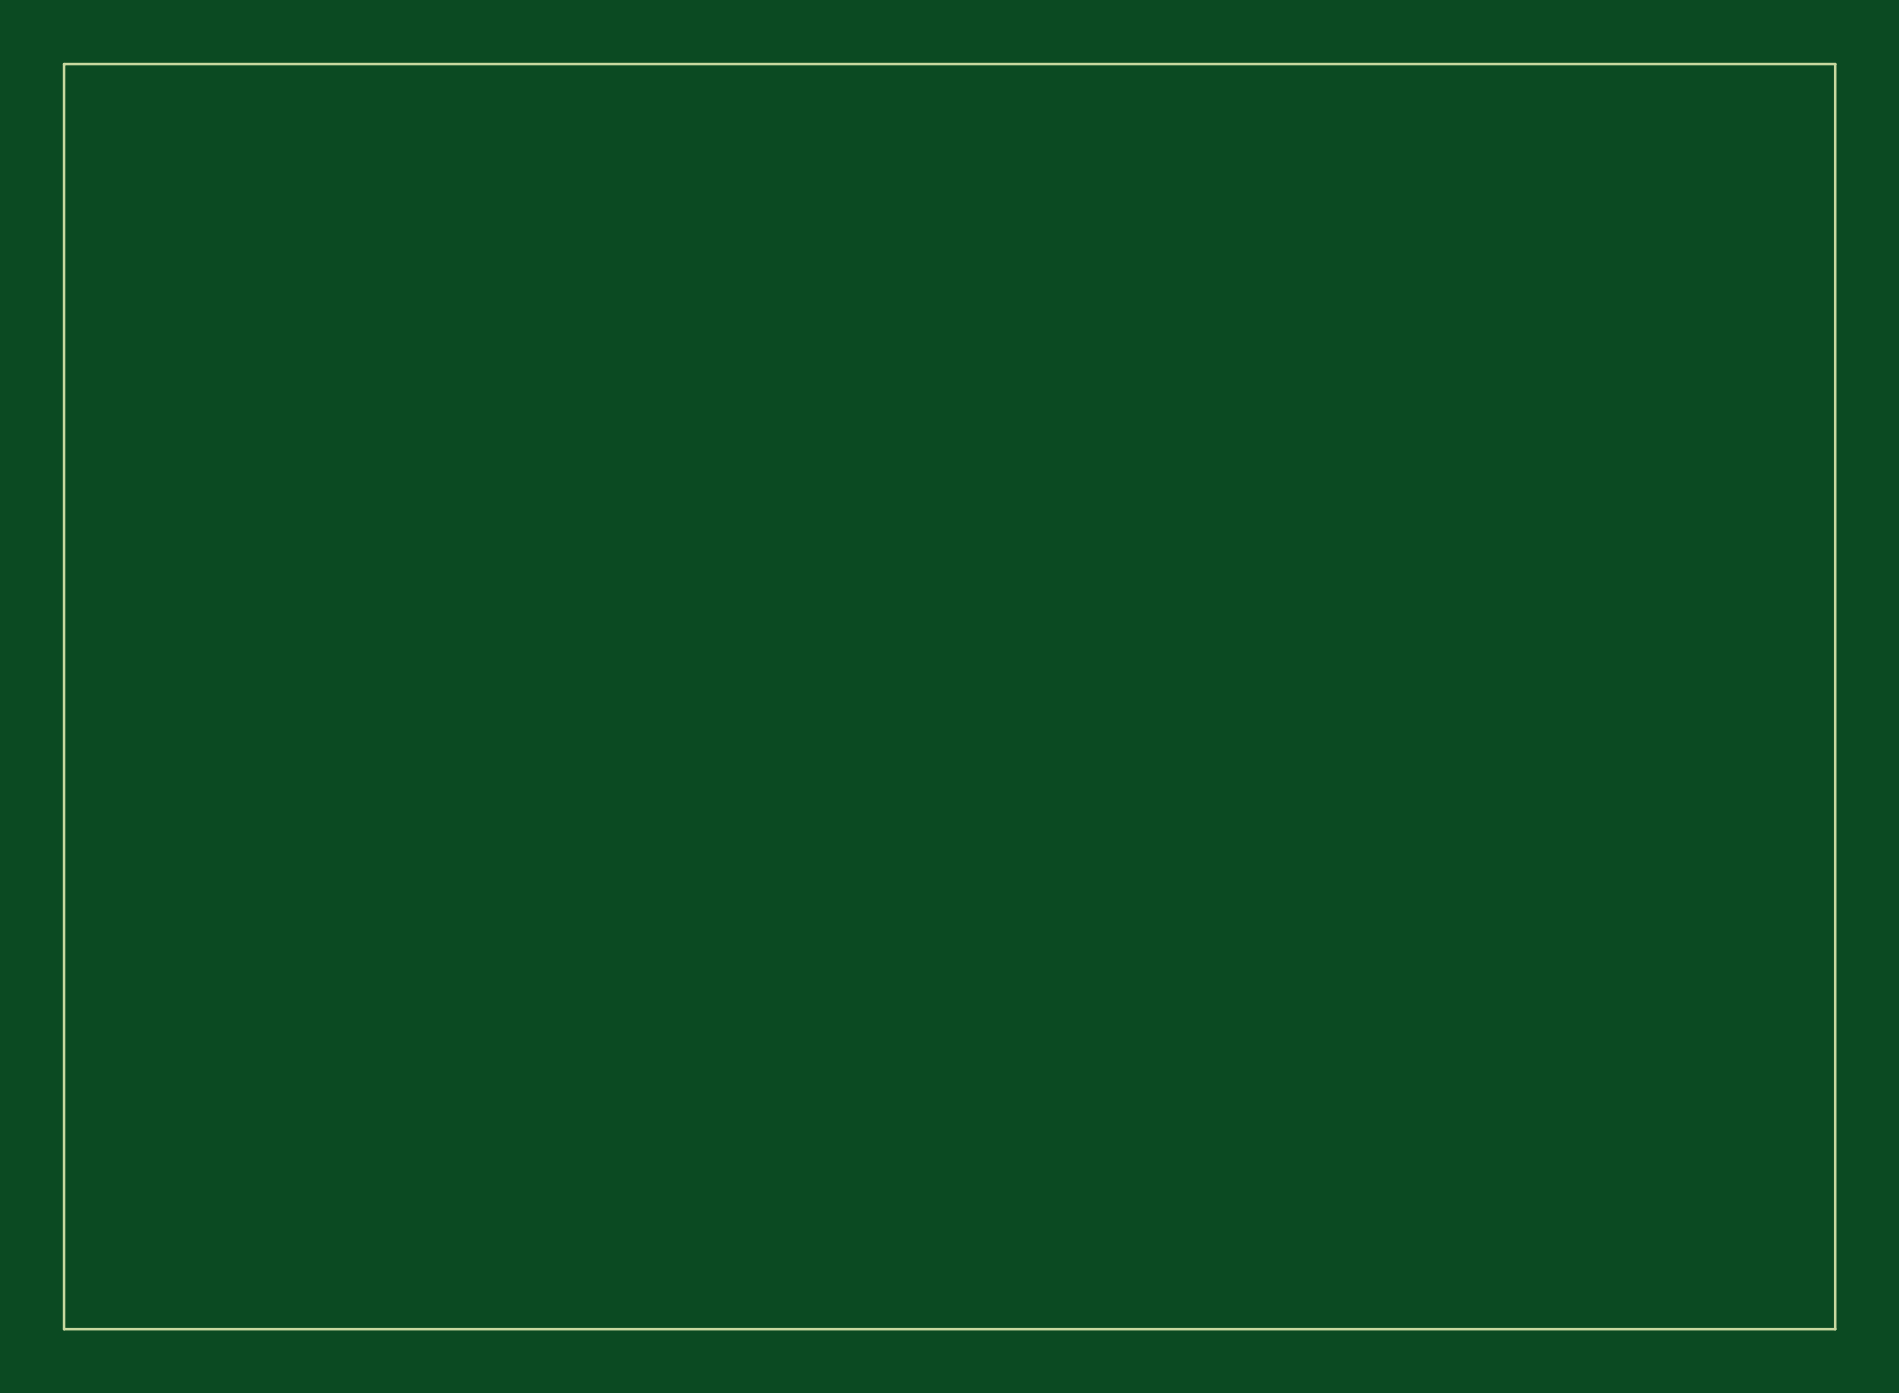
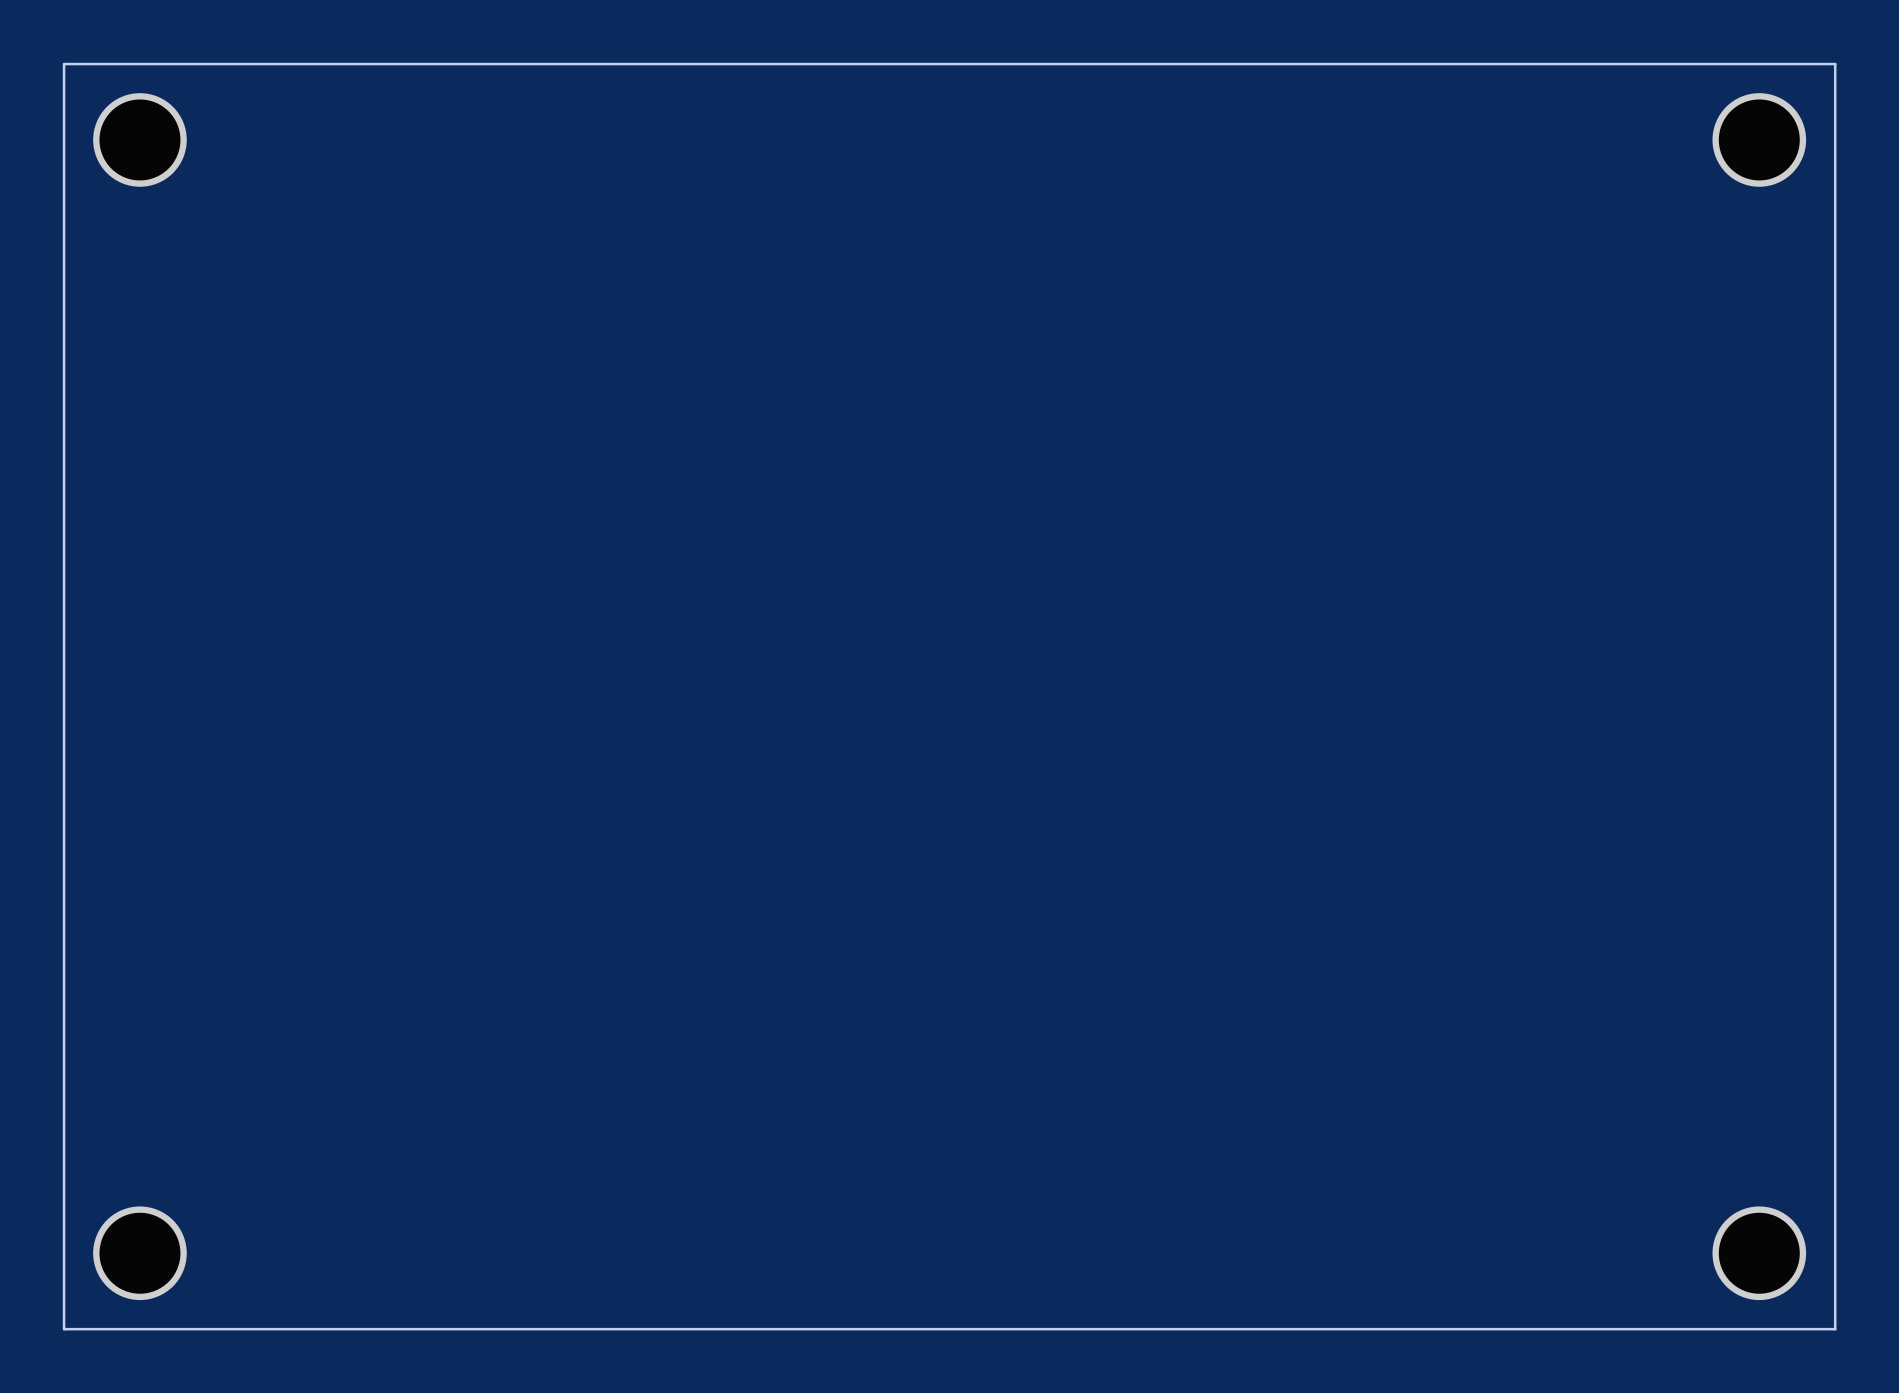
part: none -> (139, 139)
part: none -> (1759, 139)
part: none -> (139, 1253)
part: none -> (1759, 1253)

